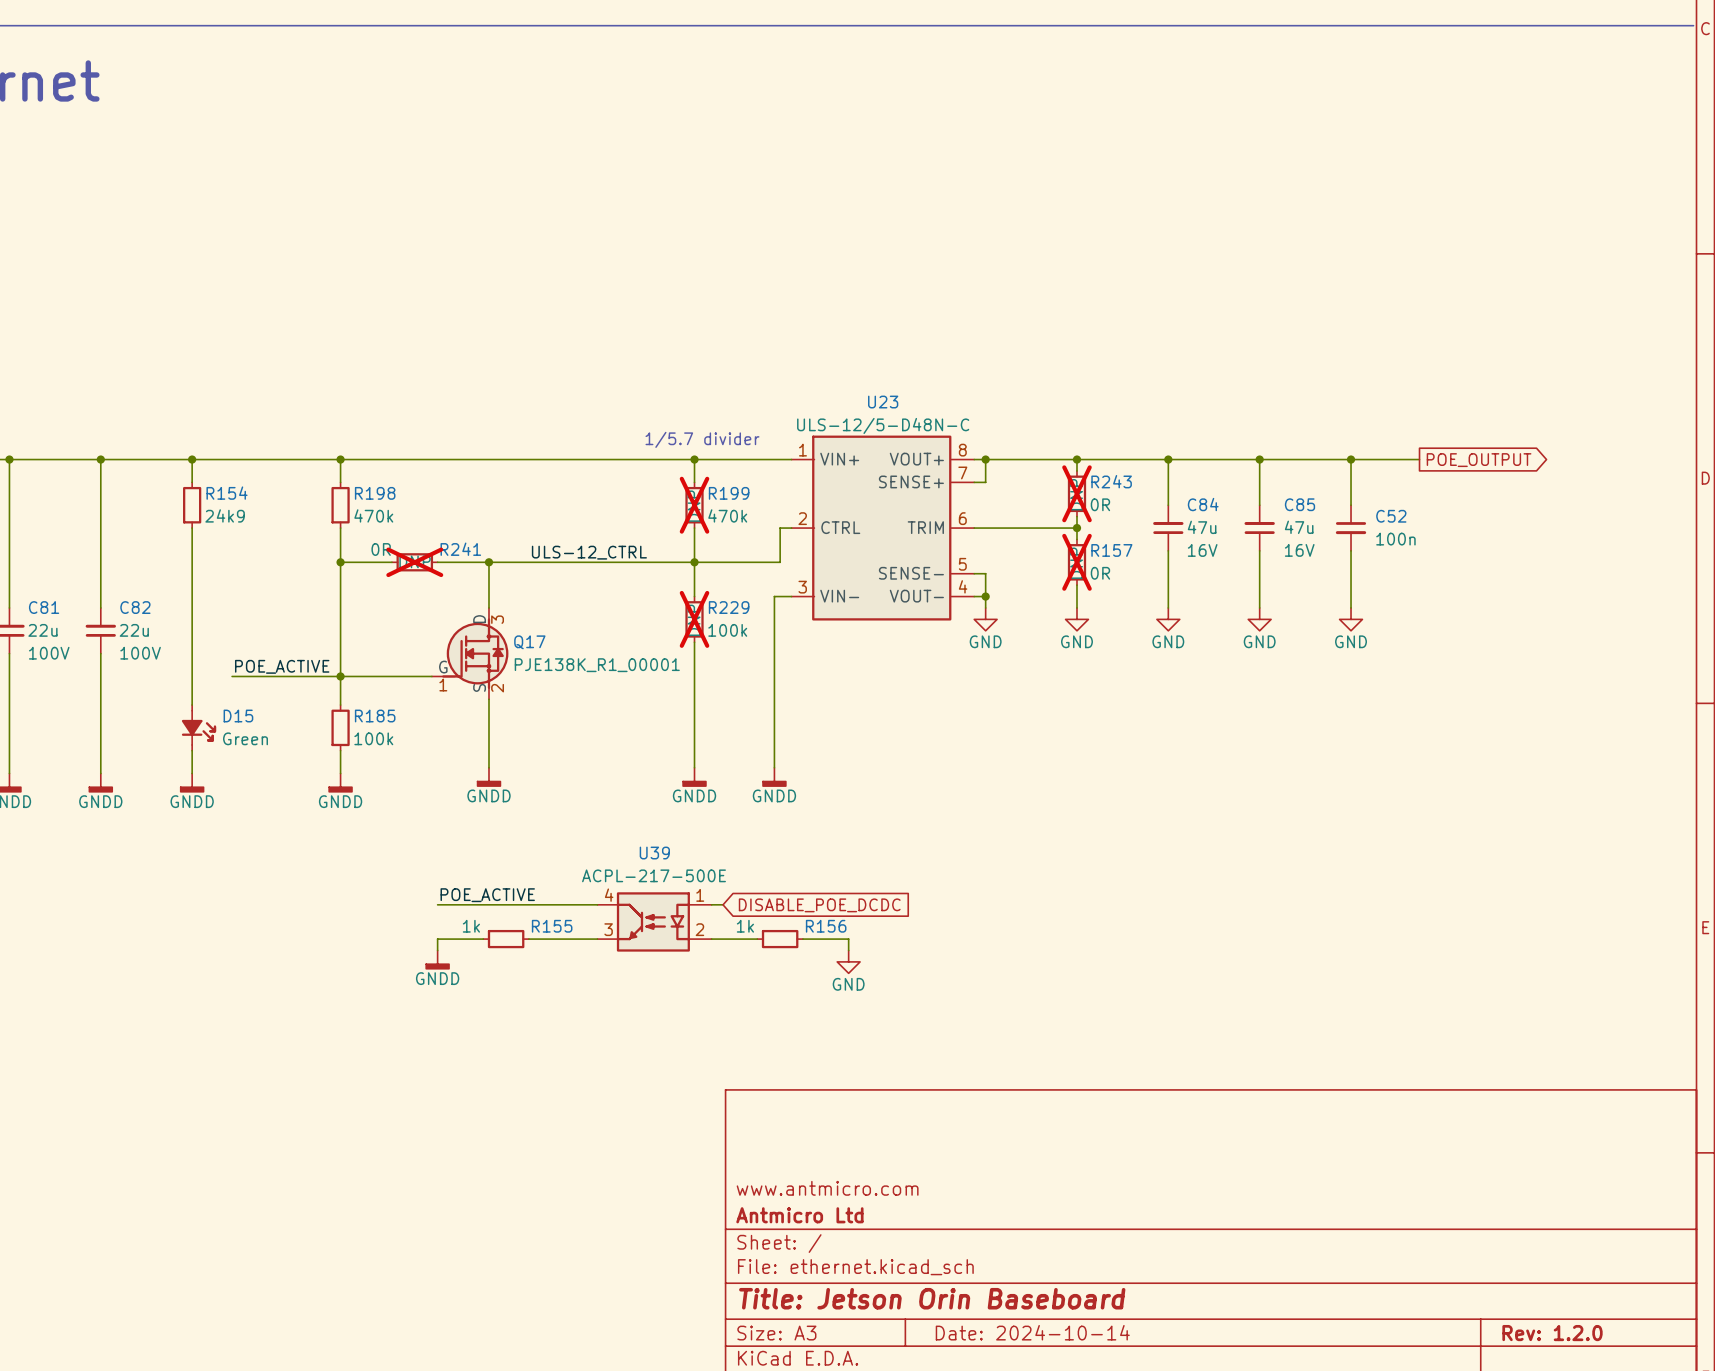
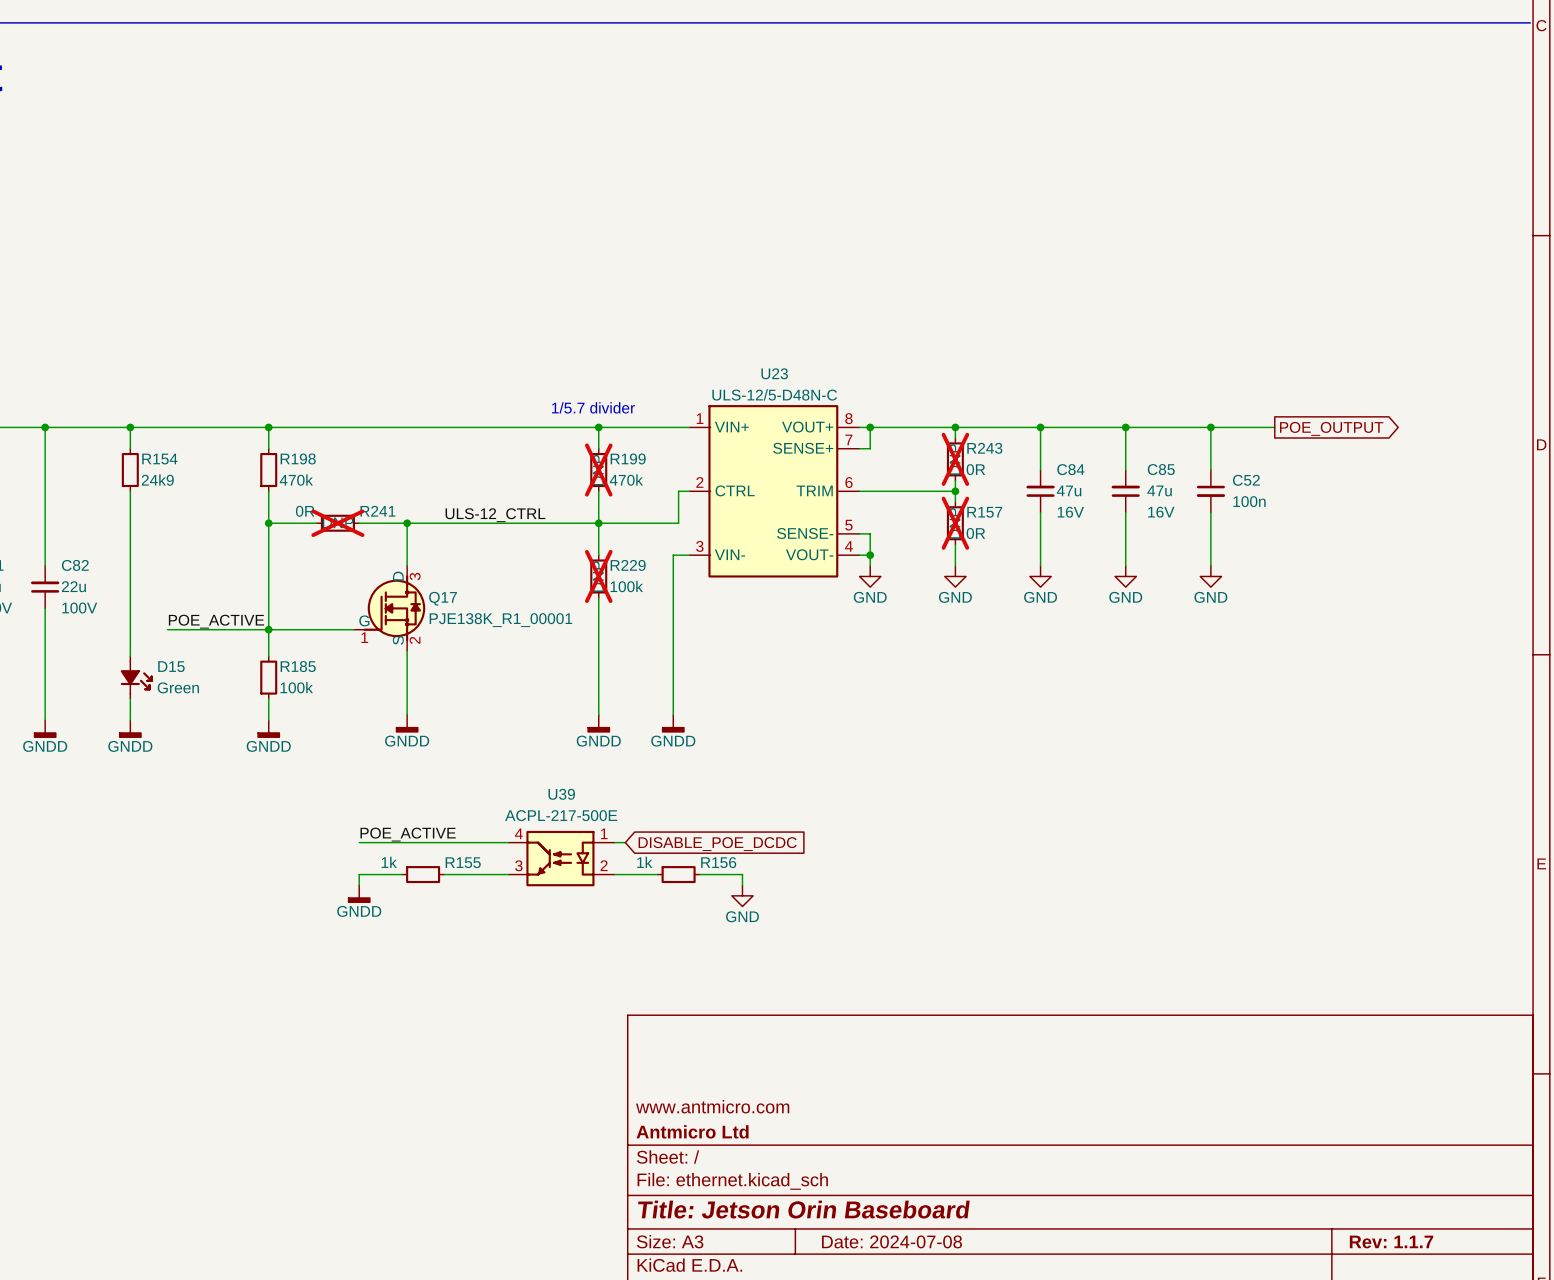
title block: Date: 2024-10-14 (1032, 1332) -> Date: 2024-07-08 (892, 1241)
title block: Rev: 1.2.0 (1552, 1333) -> Rev: 1.1.7 (1391, 1242)

